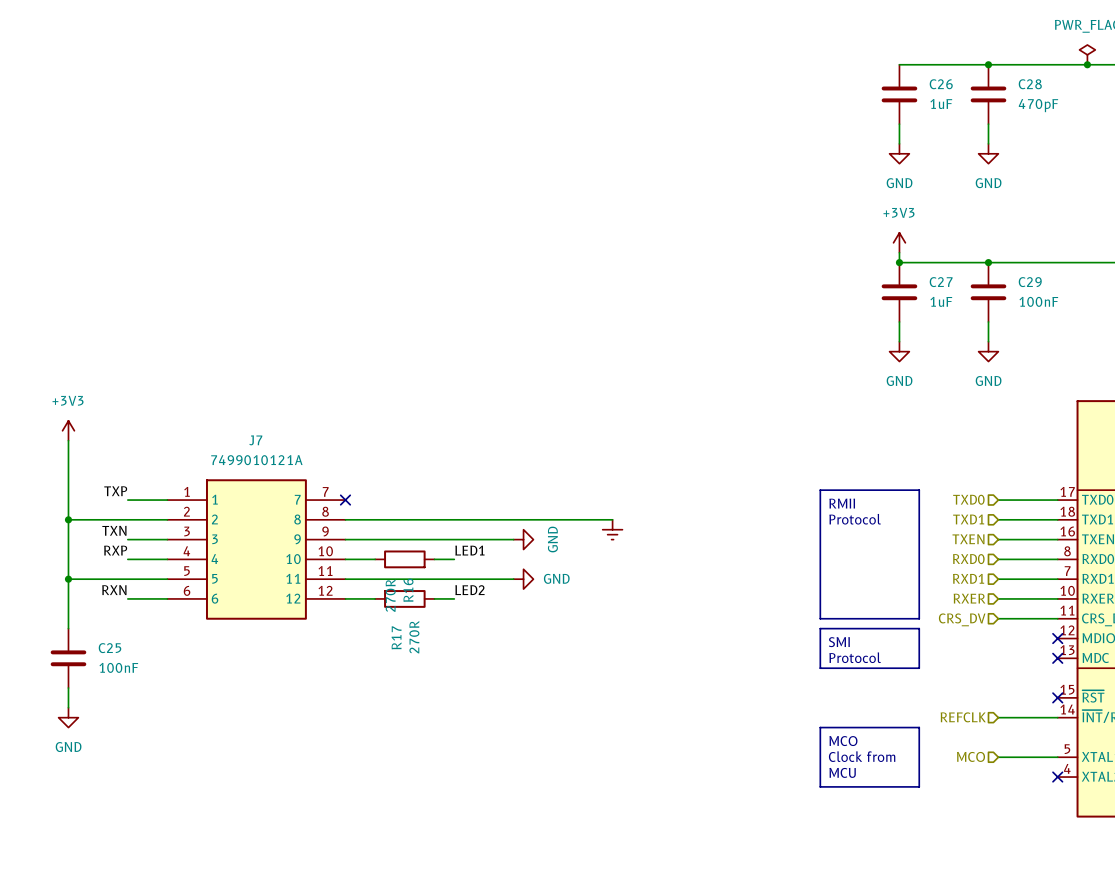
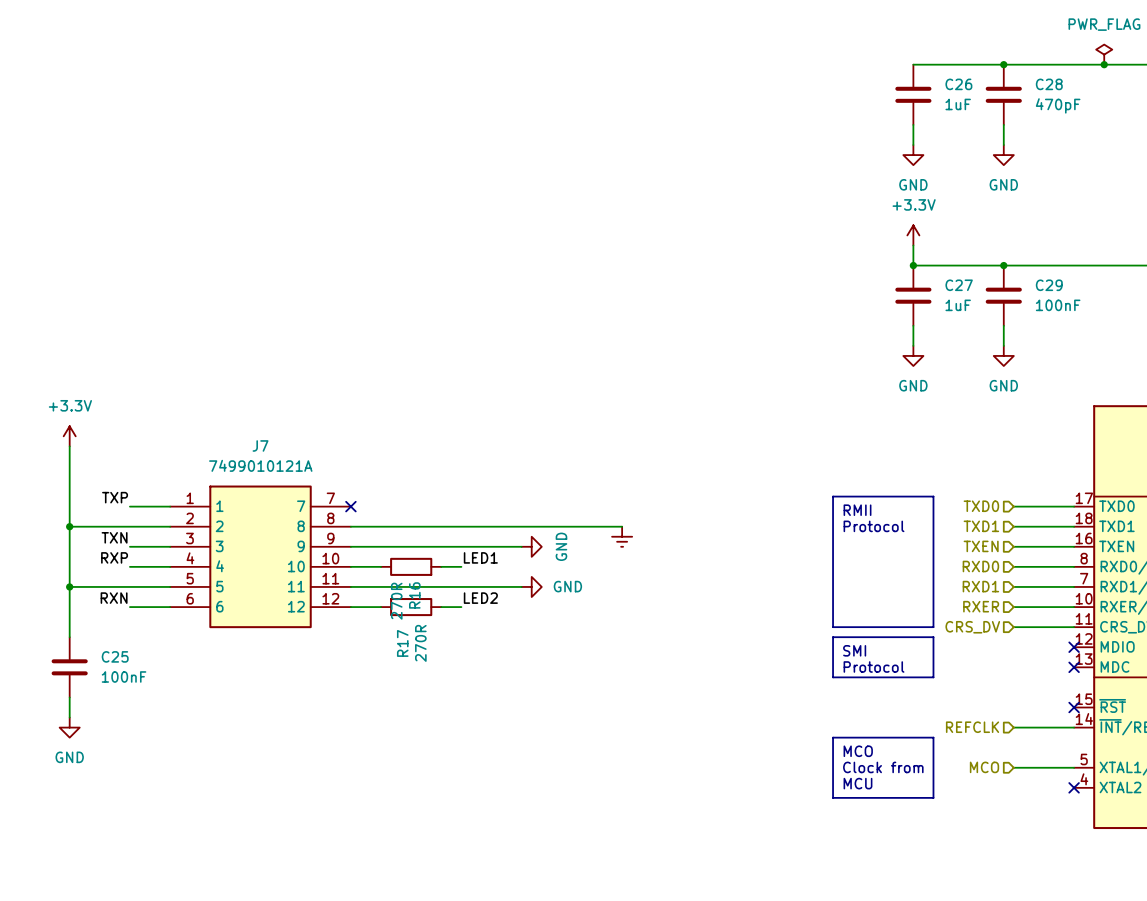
power symbol: none -> +3.3V (913, 235)
power symbol: +3V3 (899, 242) -> none
power symbol: +3V3 (68, 430) -> +3.3V (69, 436)

